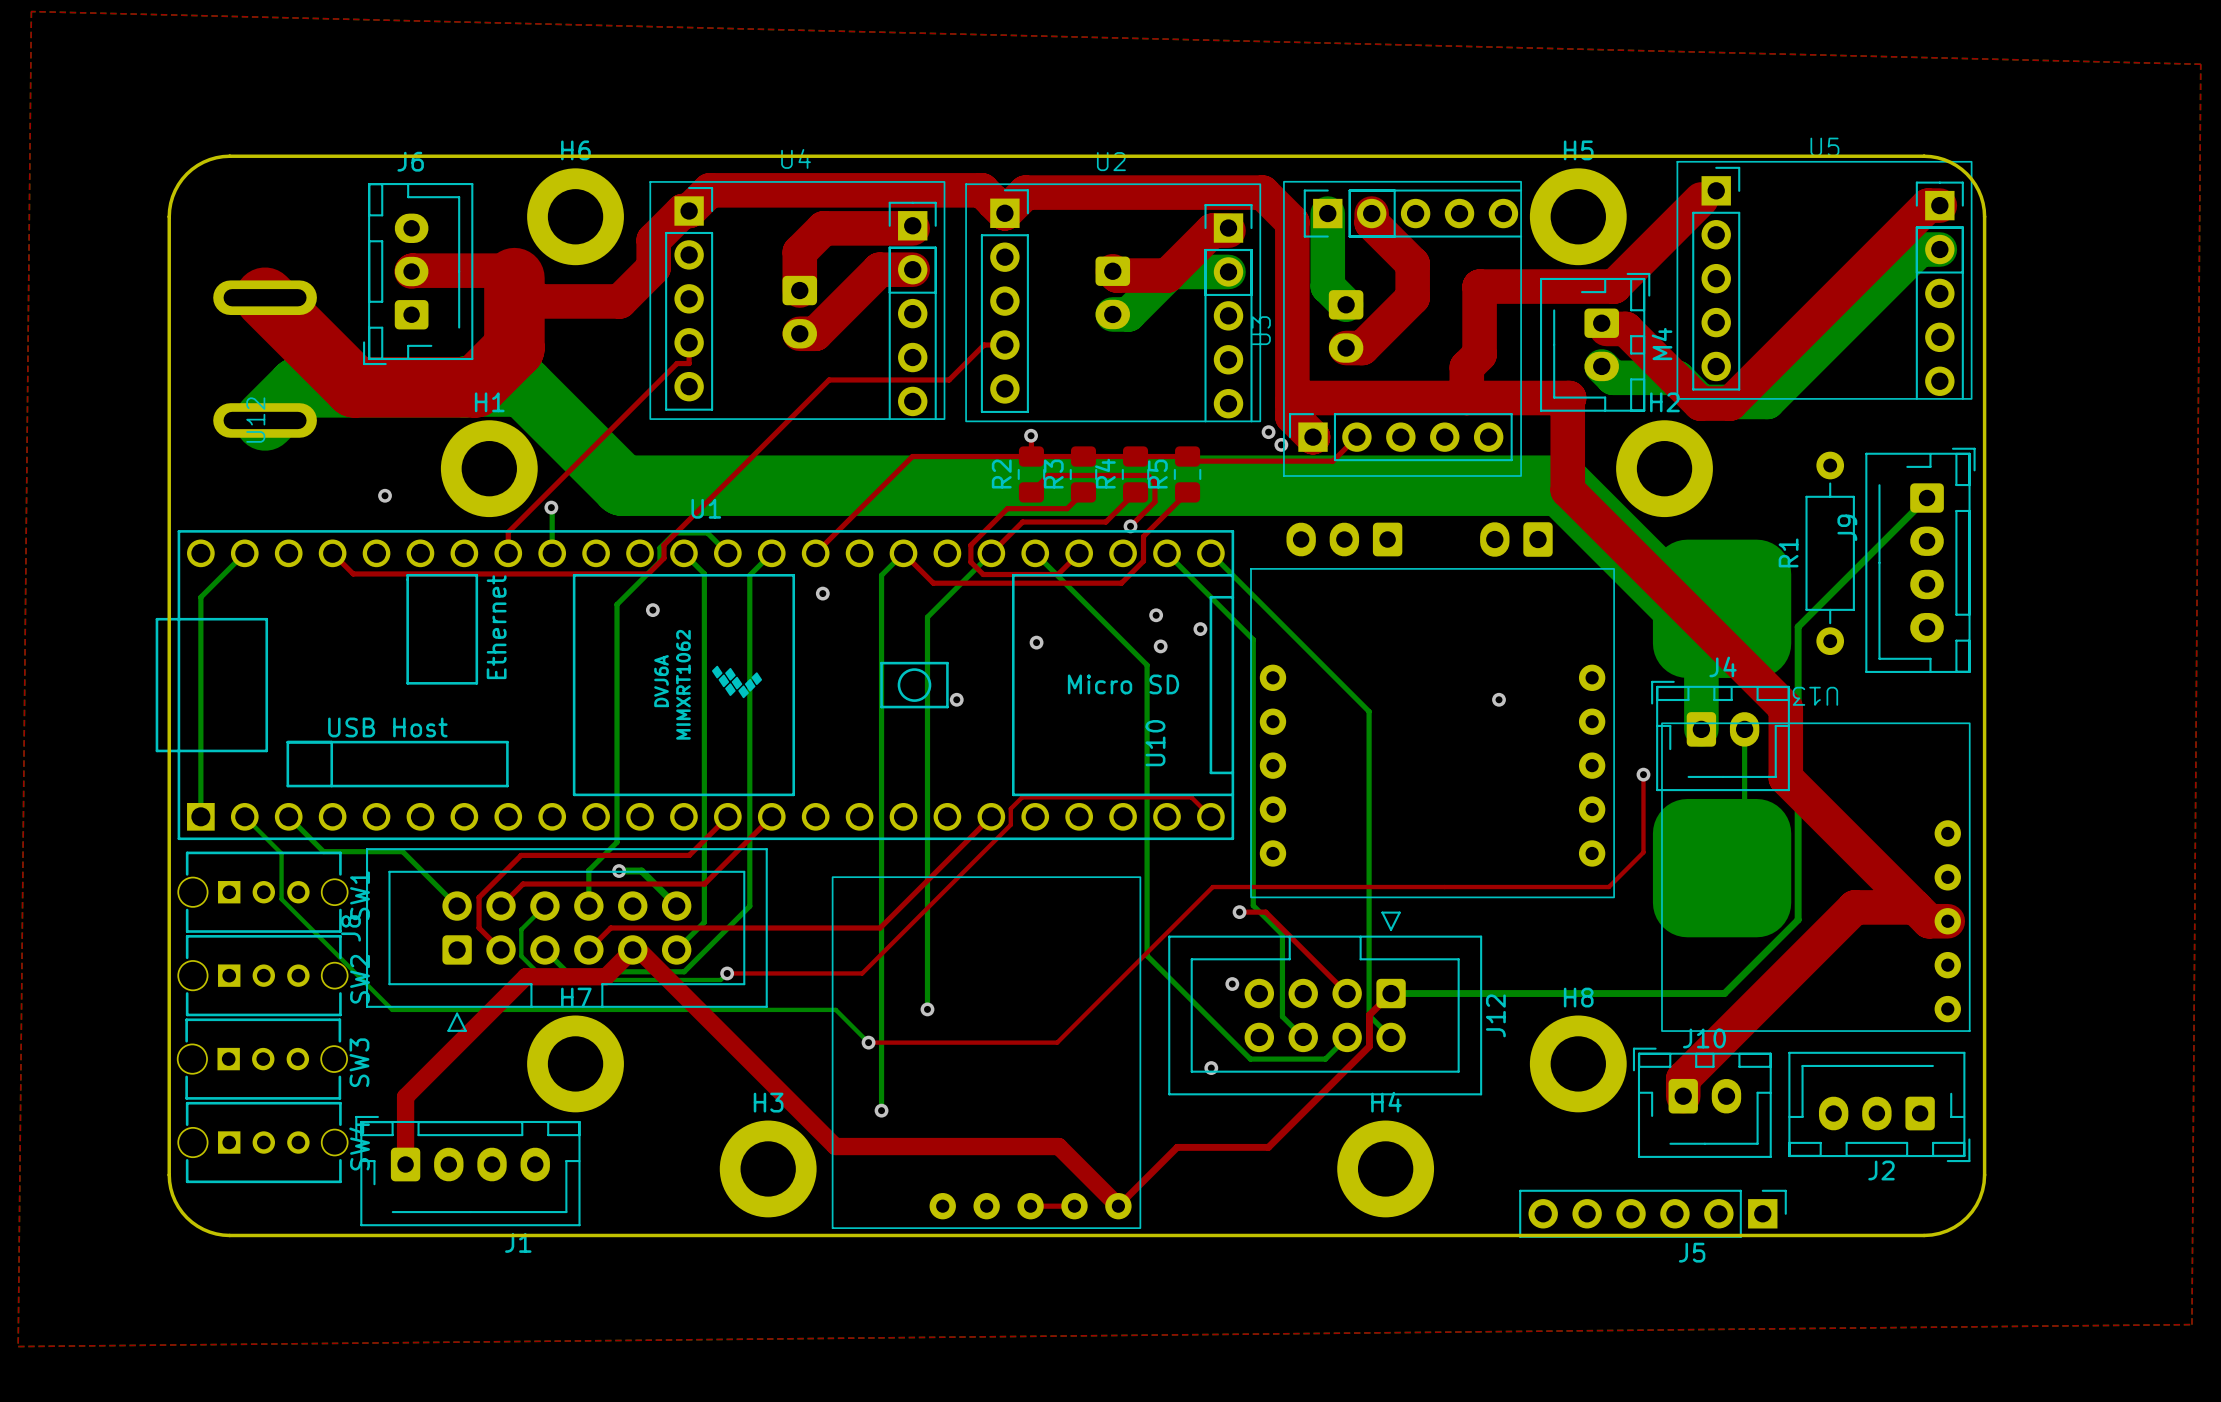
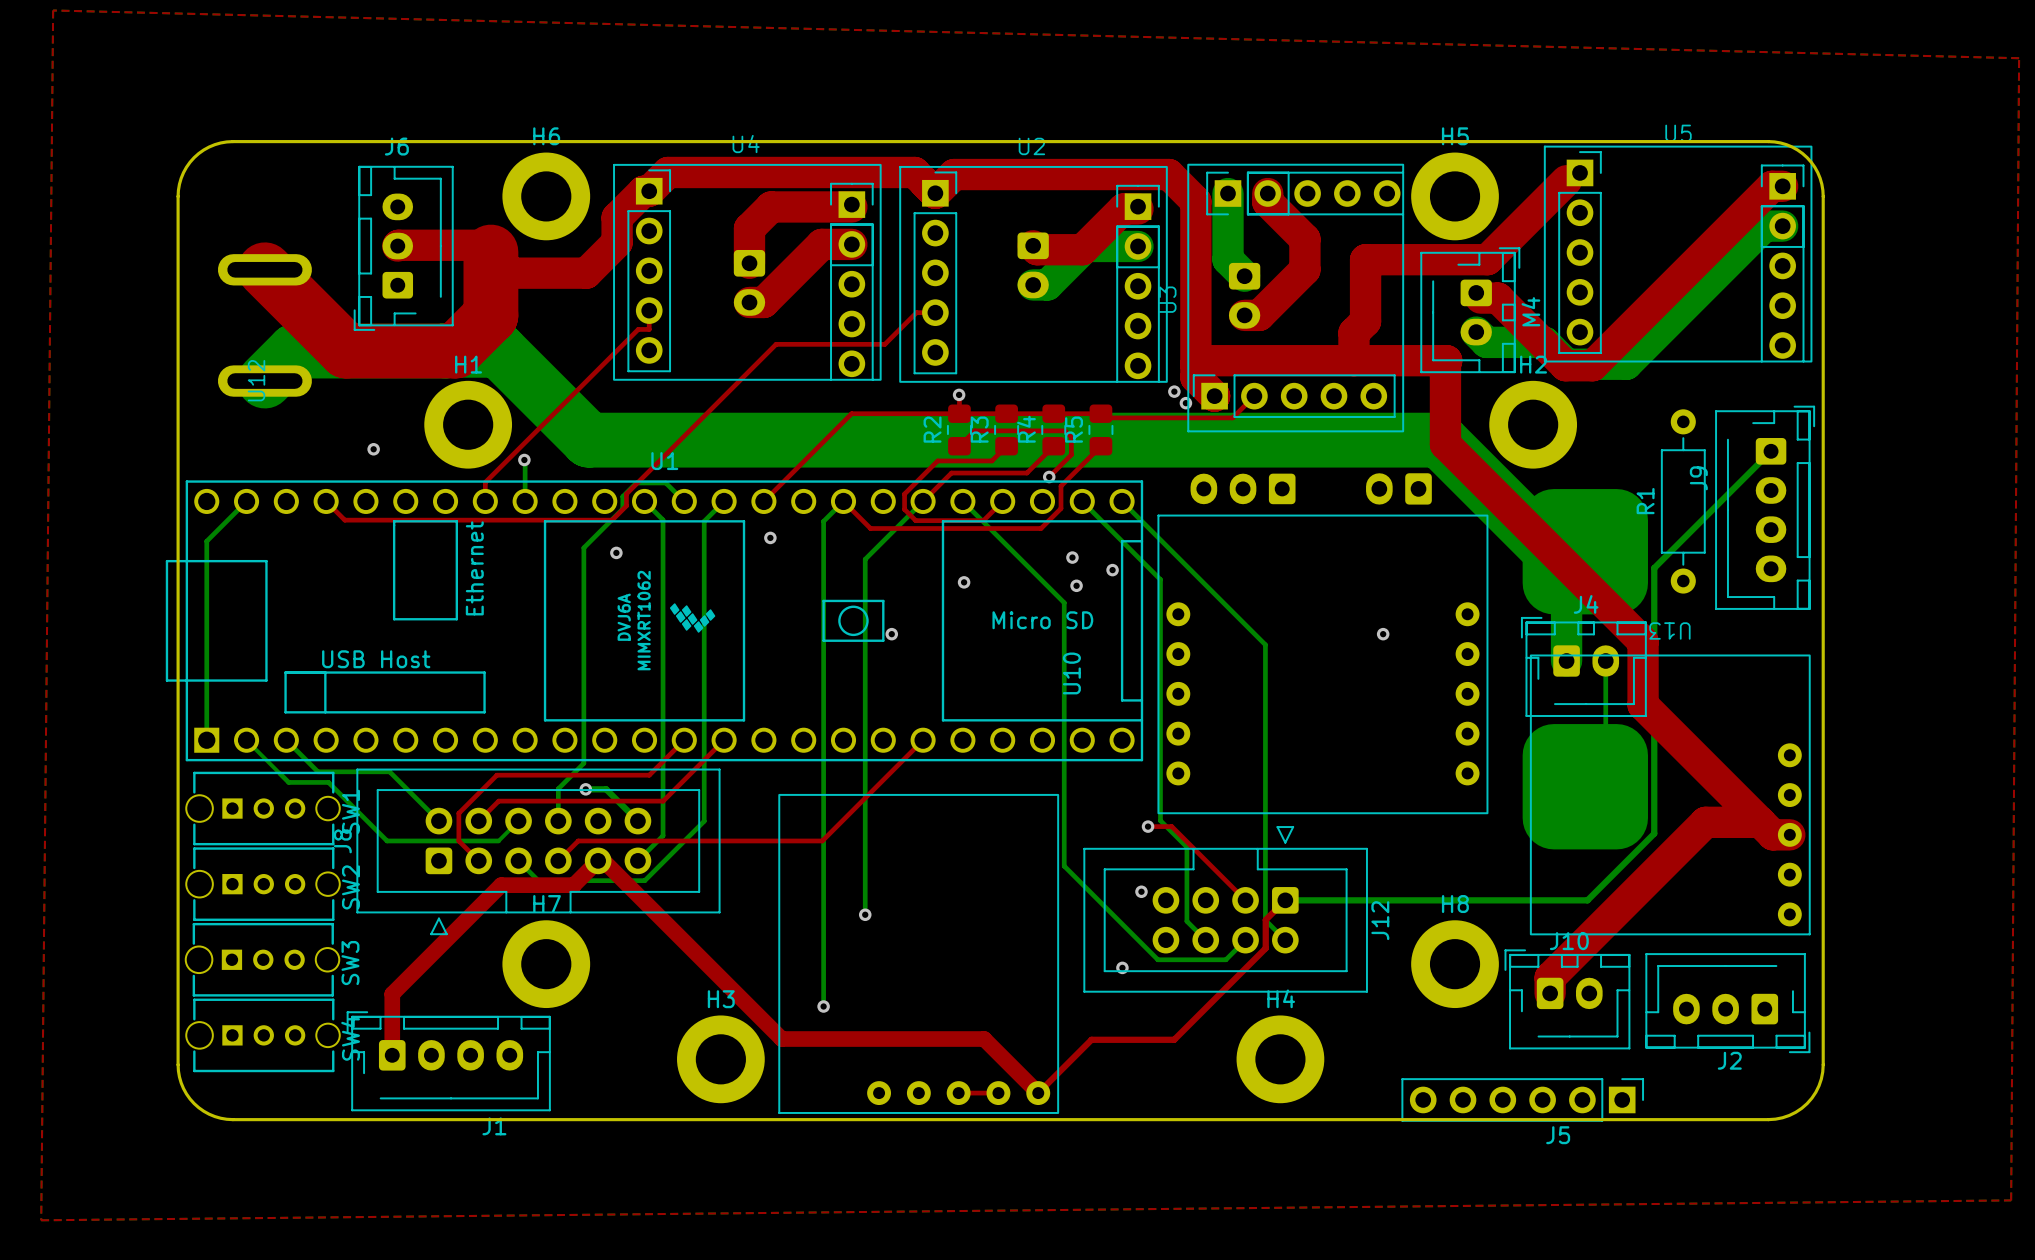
top track: (1643, 774) (1643, 852) (1608, 887) (1212, 887) (1057, 1042) (868, 1042) -> none
via: (1643, 774) -> none
top track: (1210, 816) (1191, 797) (1022, 797) (1010, 808) (1010, 824) (862, 973) (727, 973) -> none
bottom track: (281, 853) (281, 899) (392, 1009) (835, 1009) (868, 1042) -> (279, 773) (288, 782) (328, 782) (387, 840) (498, 840)
bottom track: (522, 927) (521, 929) (521, 956) (545, 980) (720, 980) (727, 973) -> none
via: (727, 973) -> none
via: (868, 1042) -> none

